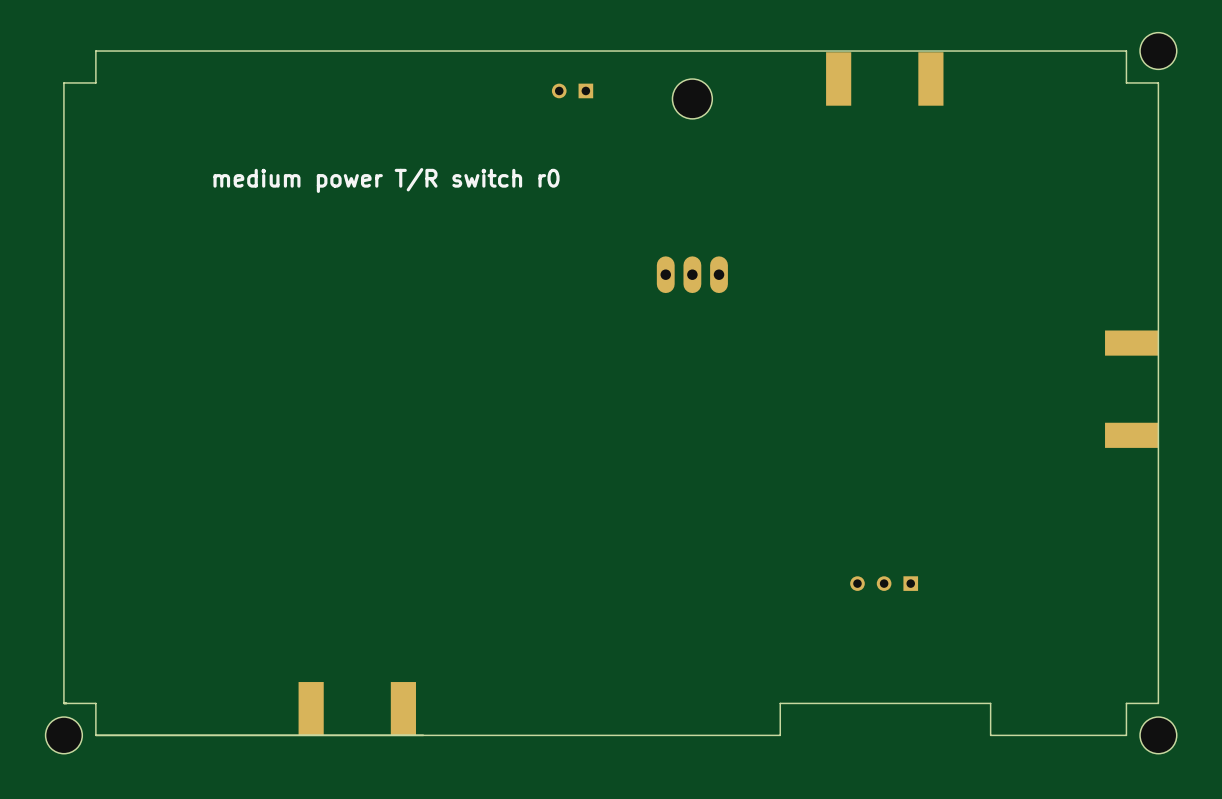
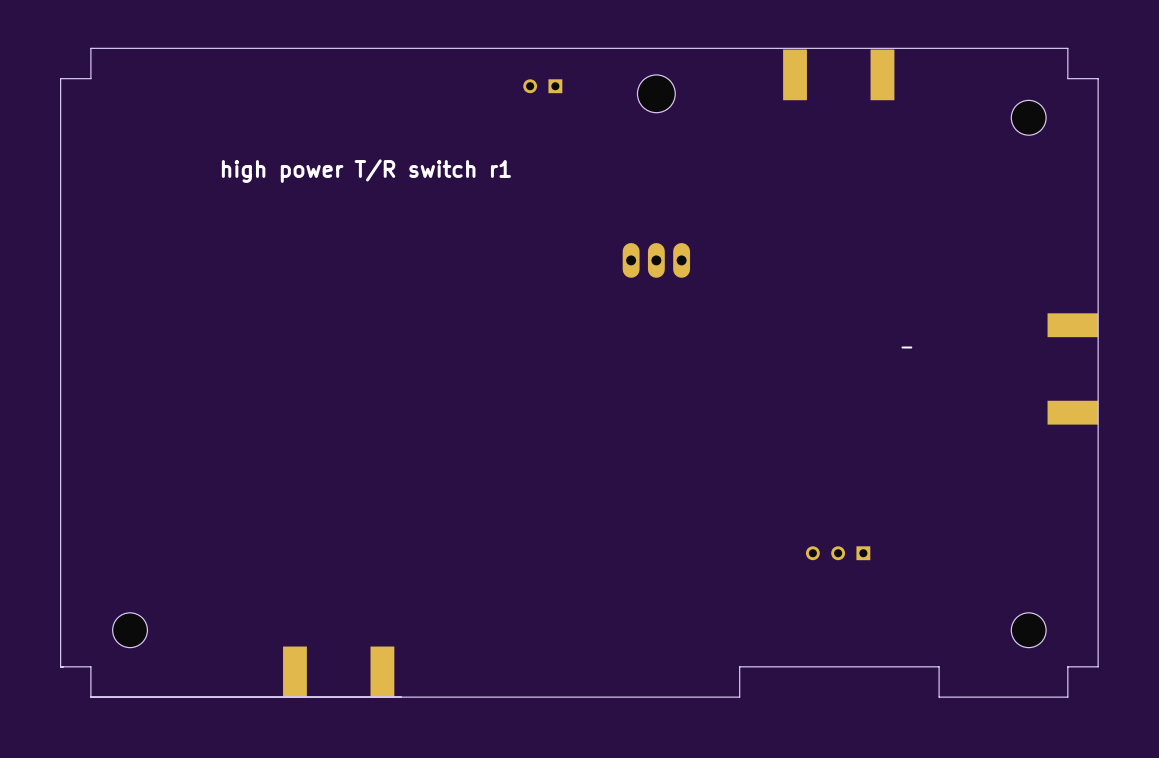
part position: (1158, 51) -> (1028, 117)
text: medium power T/R switch r0 (386, 180) -> high power T/R switch r1 (366, 171)
line: none -> (911, 347) (902, 347)
part position: (63, 735) -> (130, 630)
part position: (1158, 735) -> (1028, 630)

